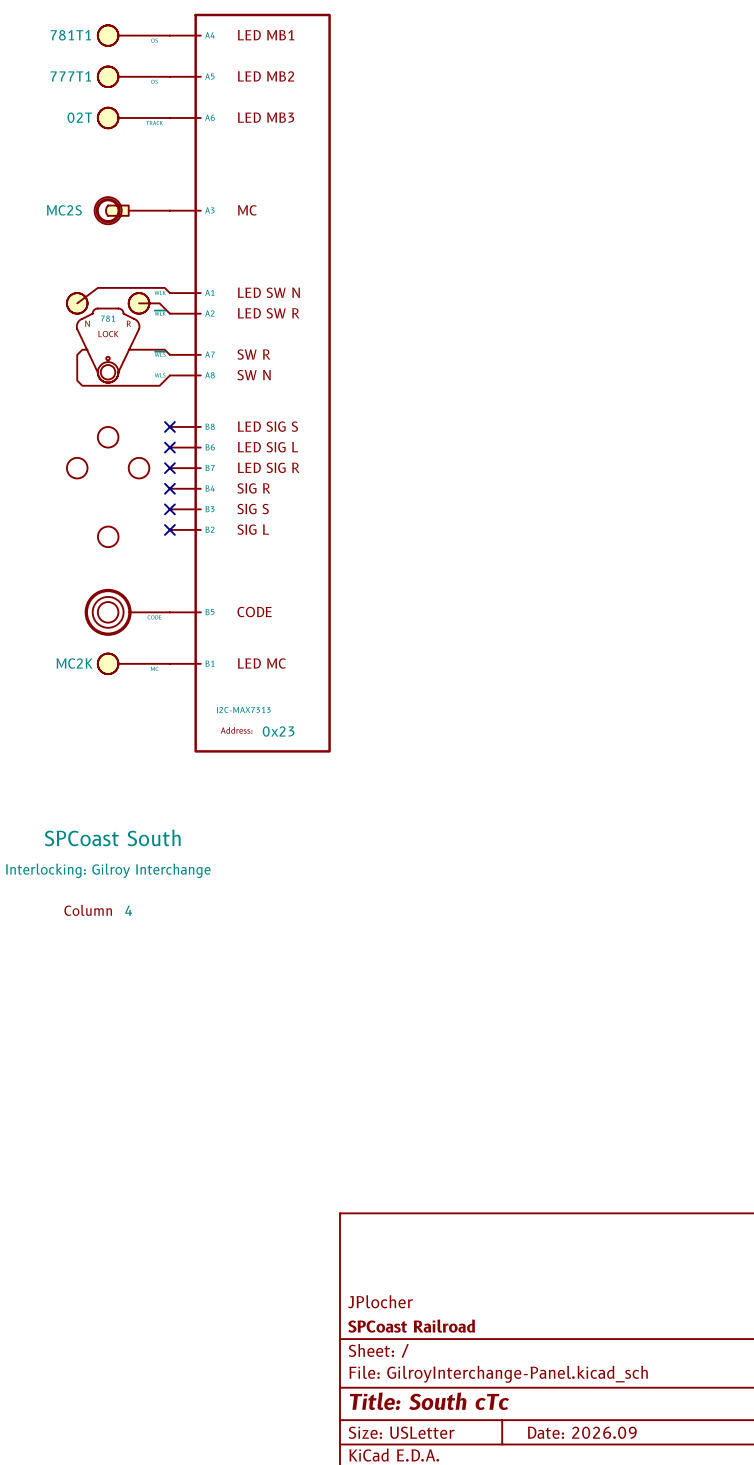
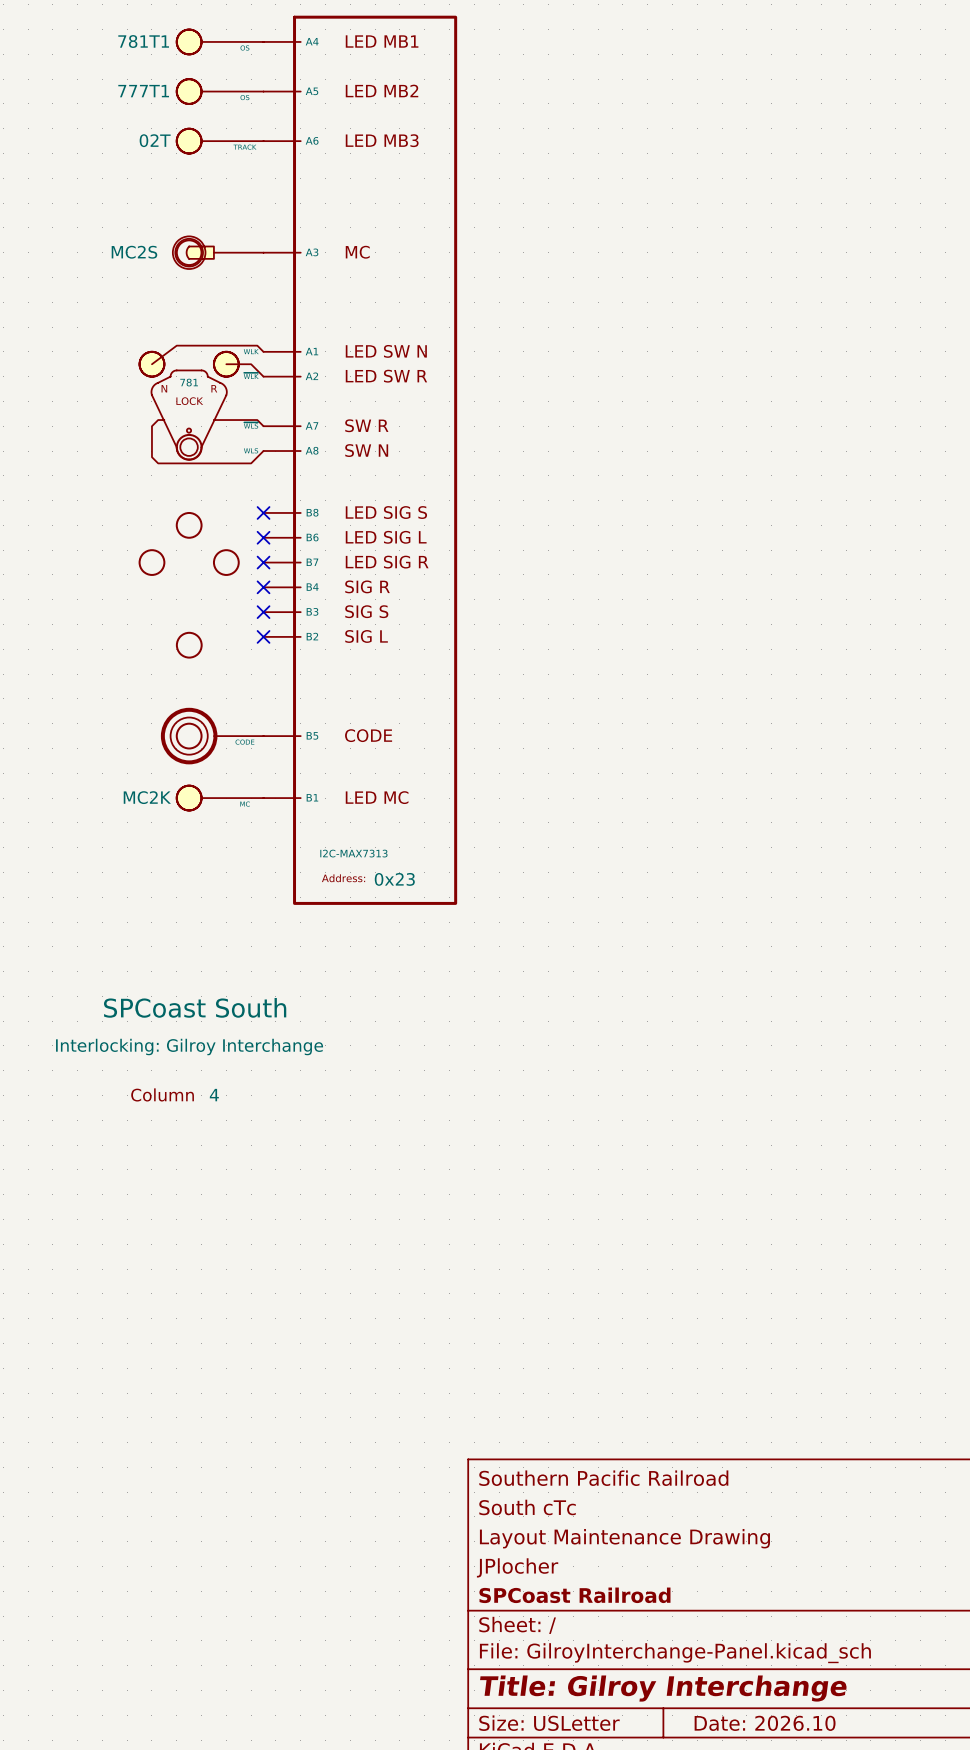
title block: none -> Southern Pacific Railroad (603, 1478)
title block: none -> South cTc (527, 1507)
title block: none -> Layout Maintenance Drawing (624, 1538)
title block: Title: South cTc (429, 1401) -> Title: Gilroy Interchange (663, 1688)
title block: Date: 2026.09 (582, 1432) -> Date: 2026.10 (765, 1723)

